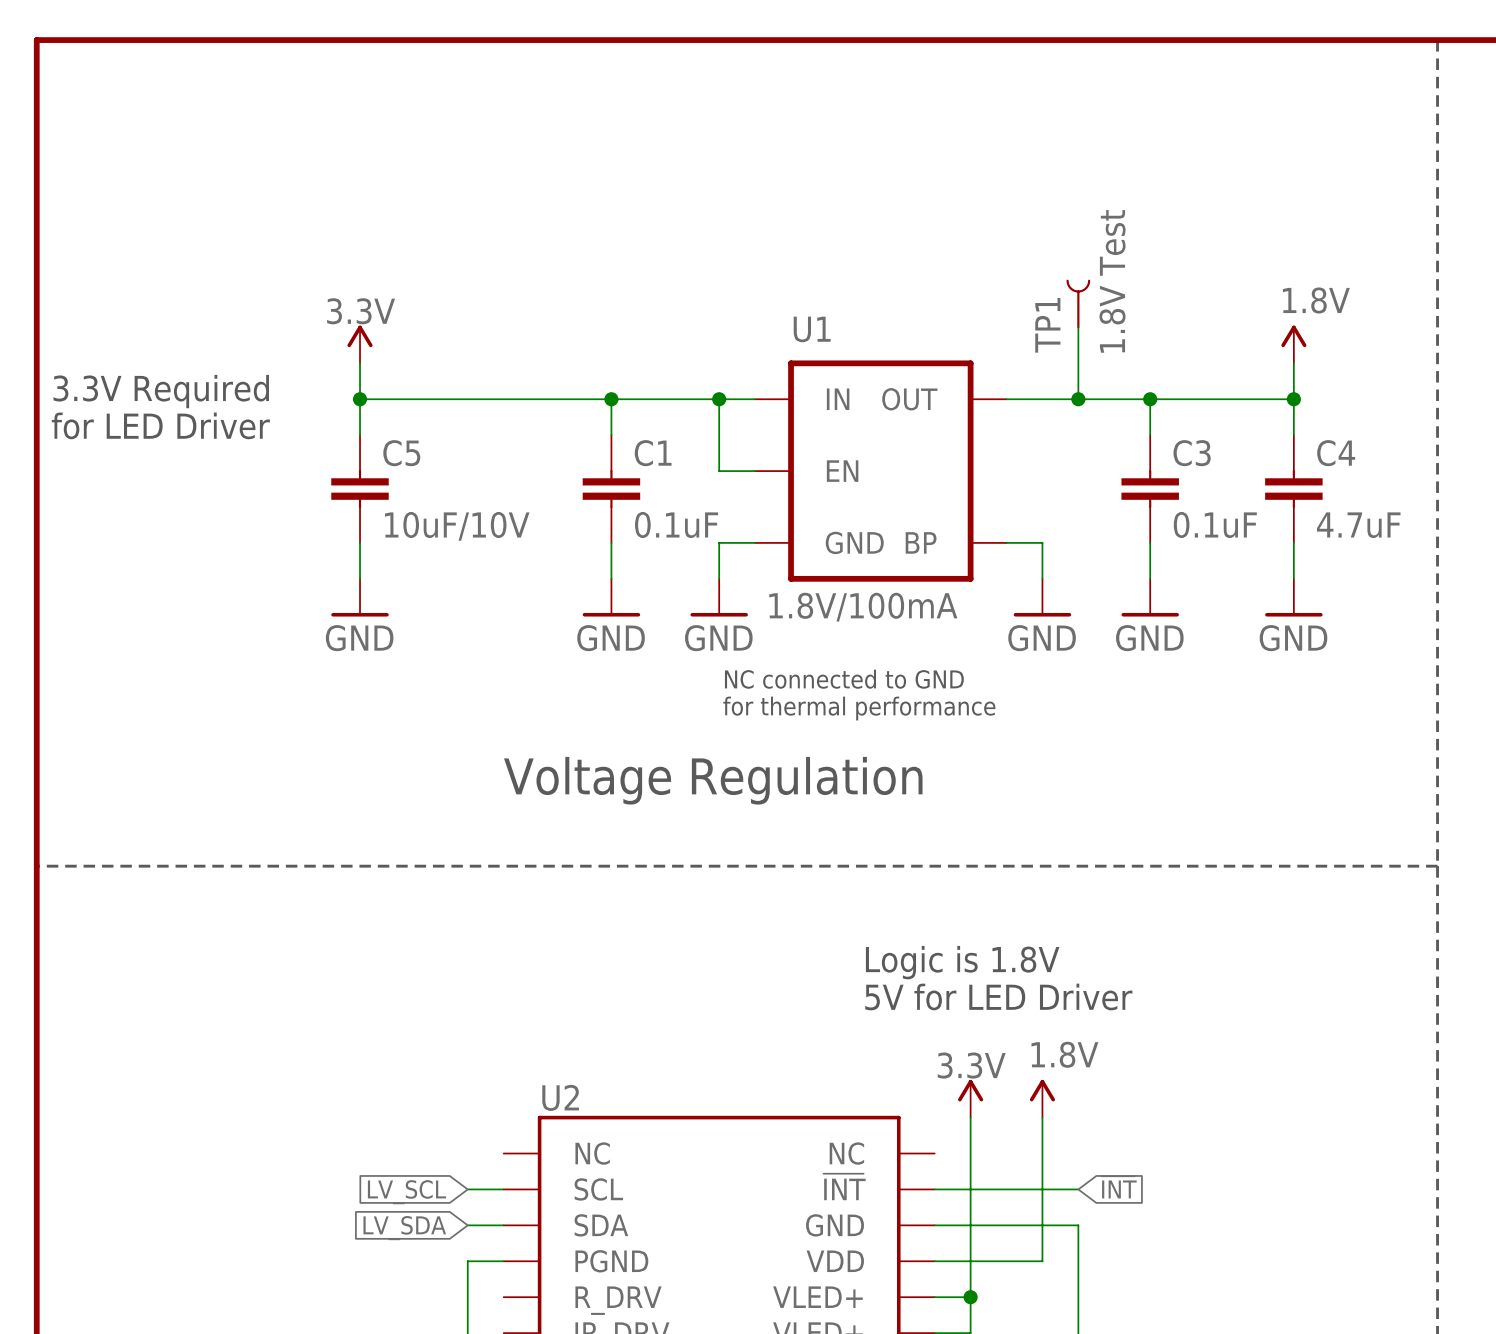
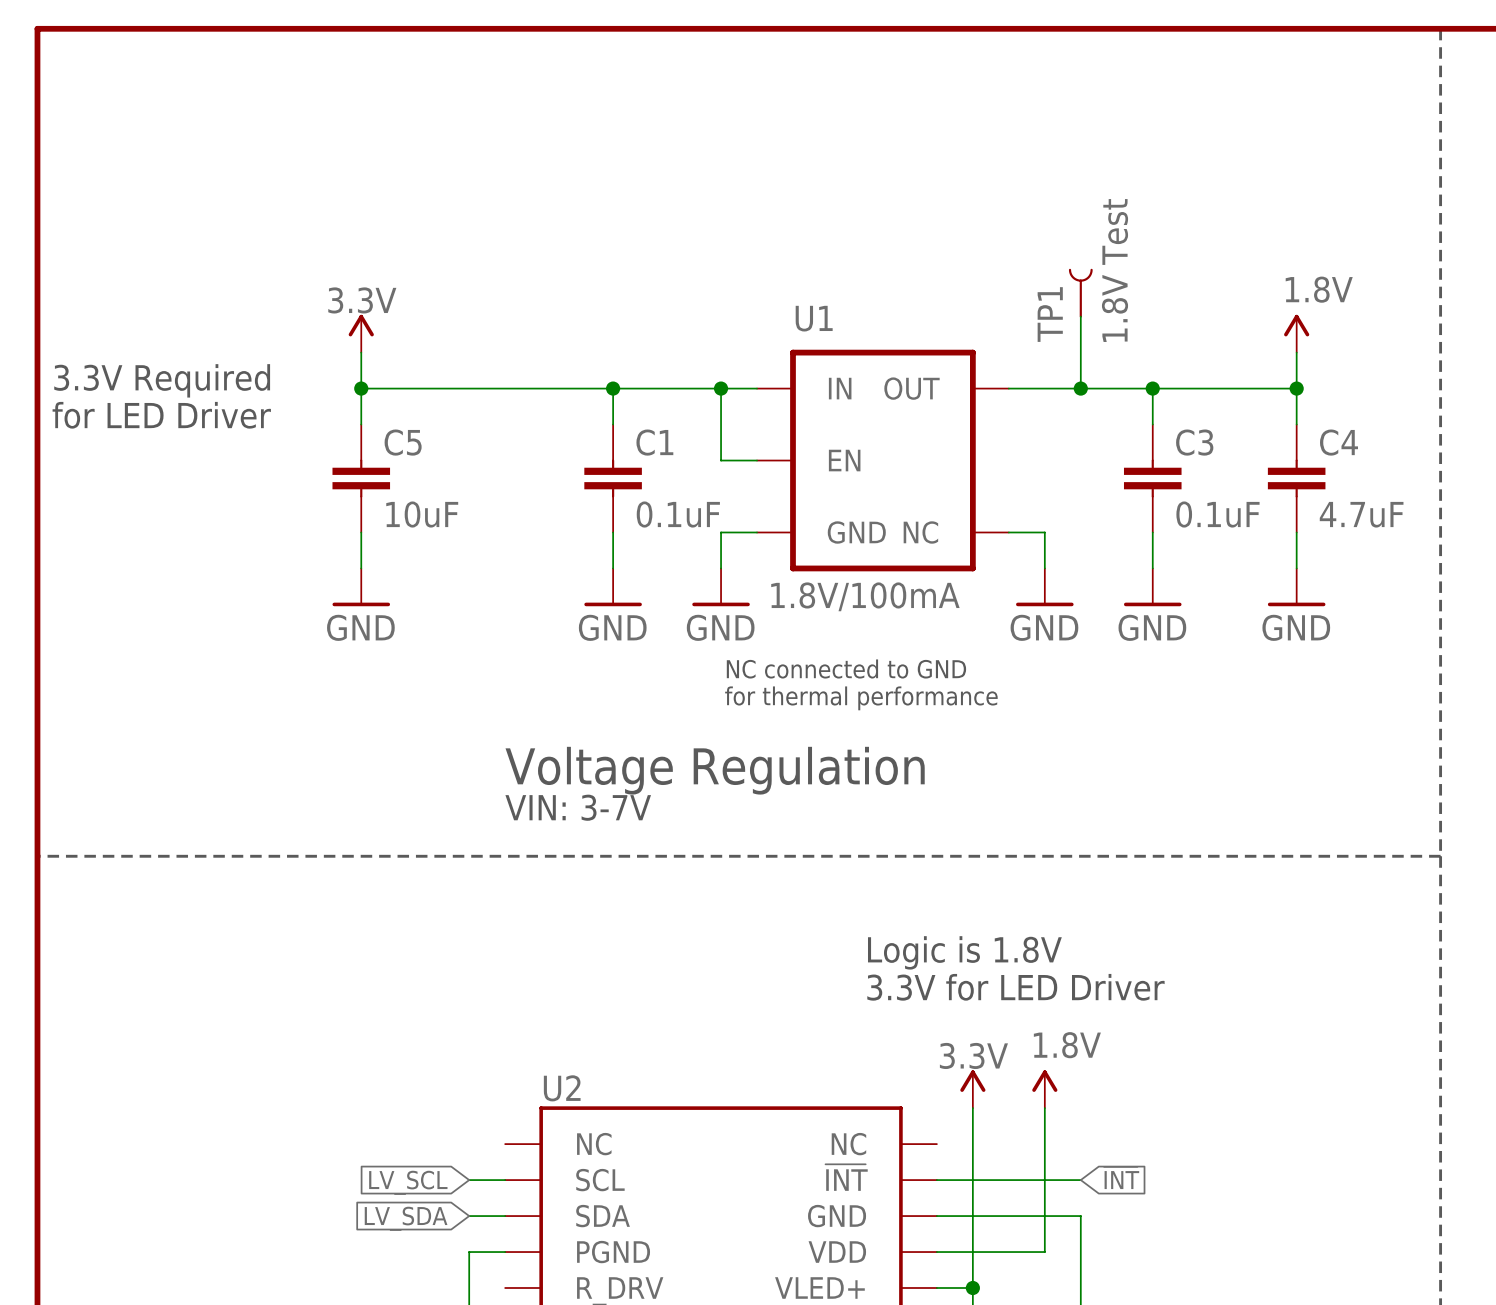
C5 value: 10uF/10V (457, 526) -> 10uF (422, 514)
U1 pin name: BP (921, 542) -> NC (920, 532)
text: none -> VIN: 3-7V (578, 807)
text: 5V for LED Driver (998, 996) -> 3.3V for LED Driver (1015, 987)

